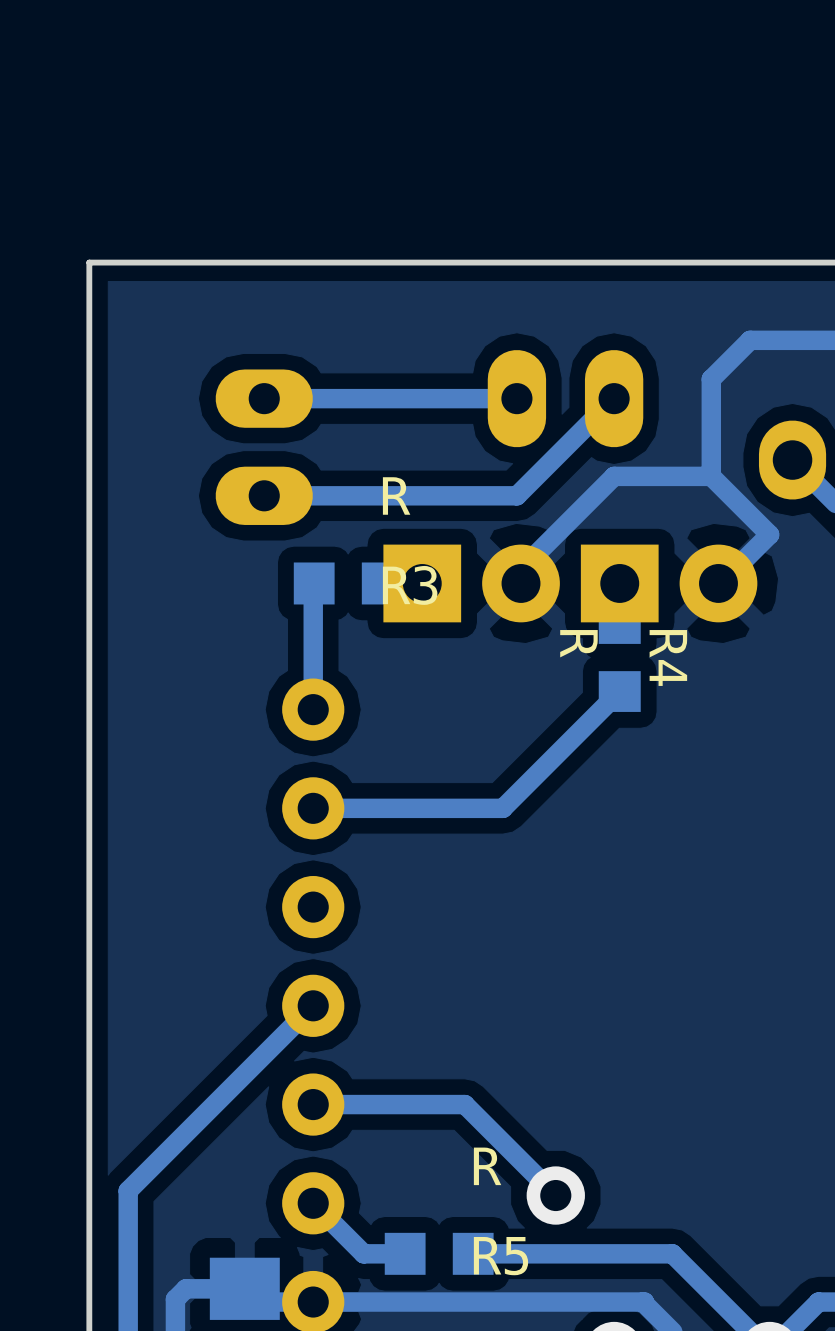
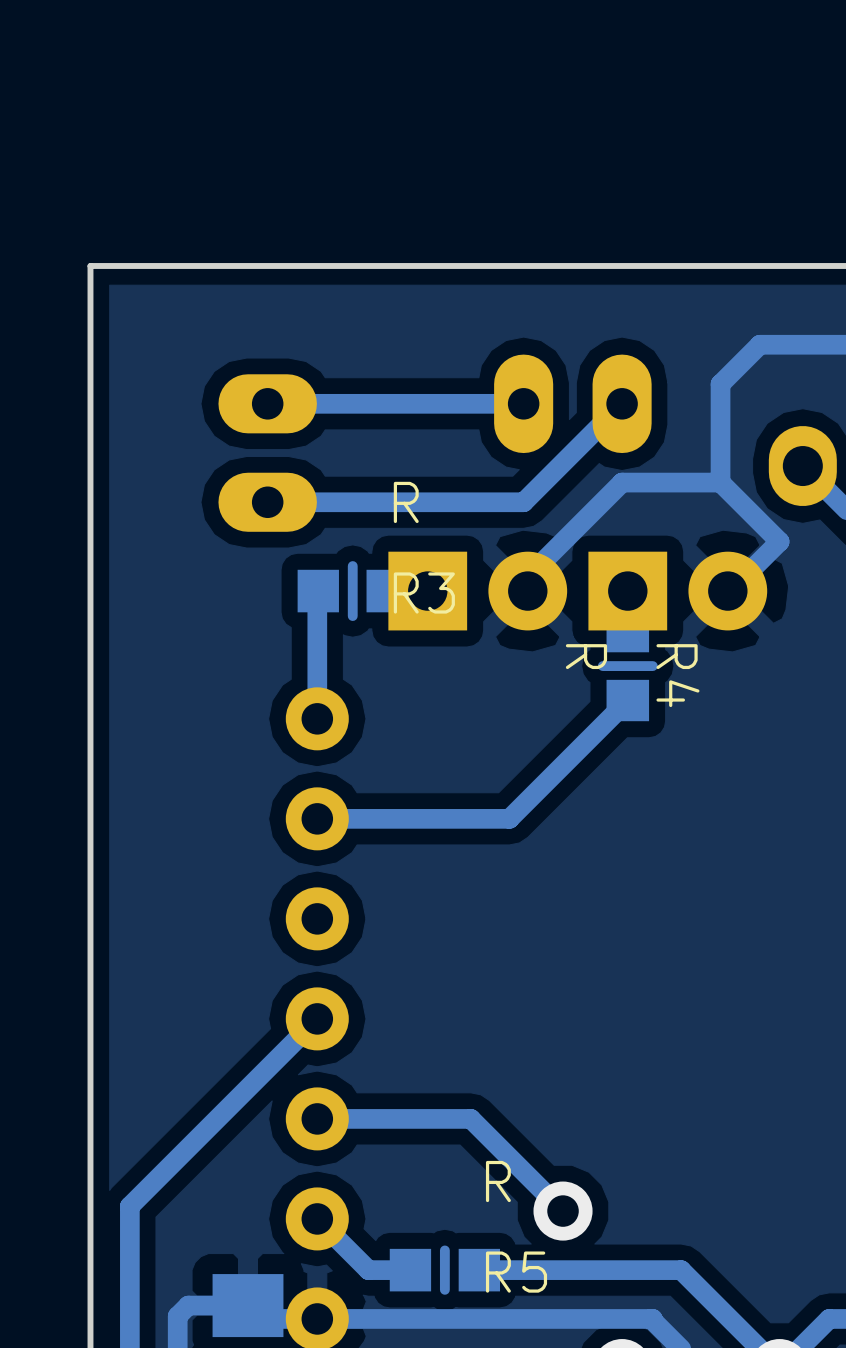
track: none -> (352, 566) (352, 616)
track: none -> (652, 666) (602, 666)
track: none -> (444, 1250) (444, 1289)

